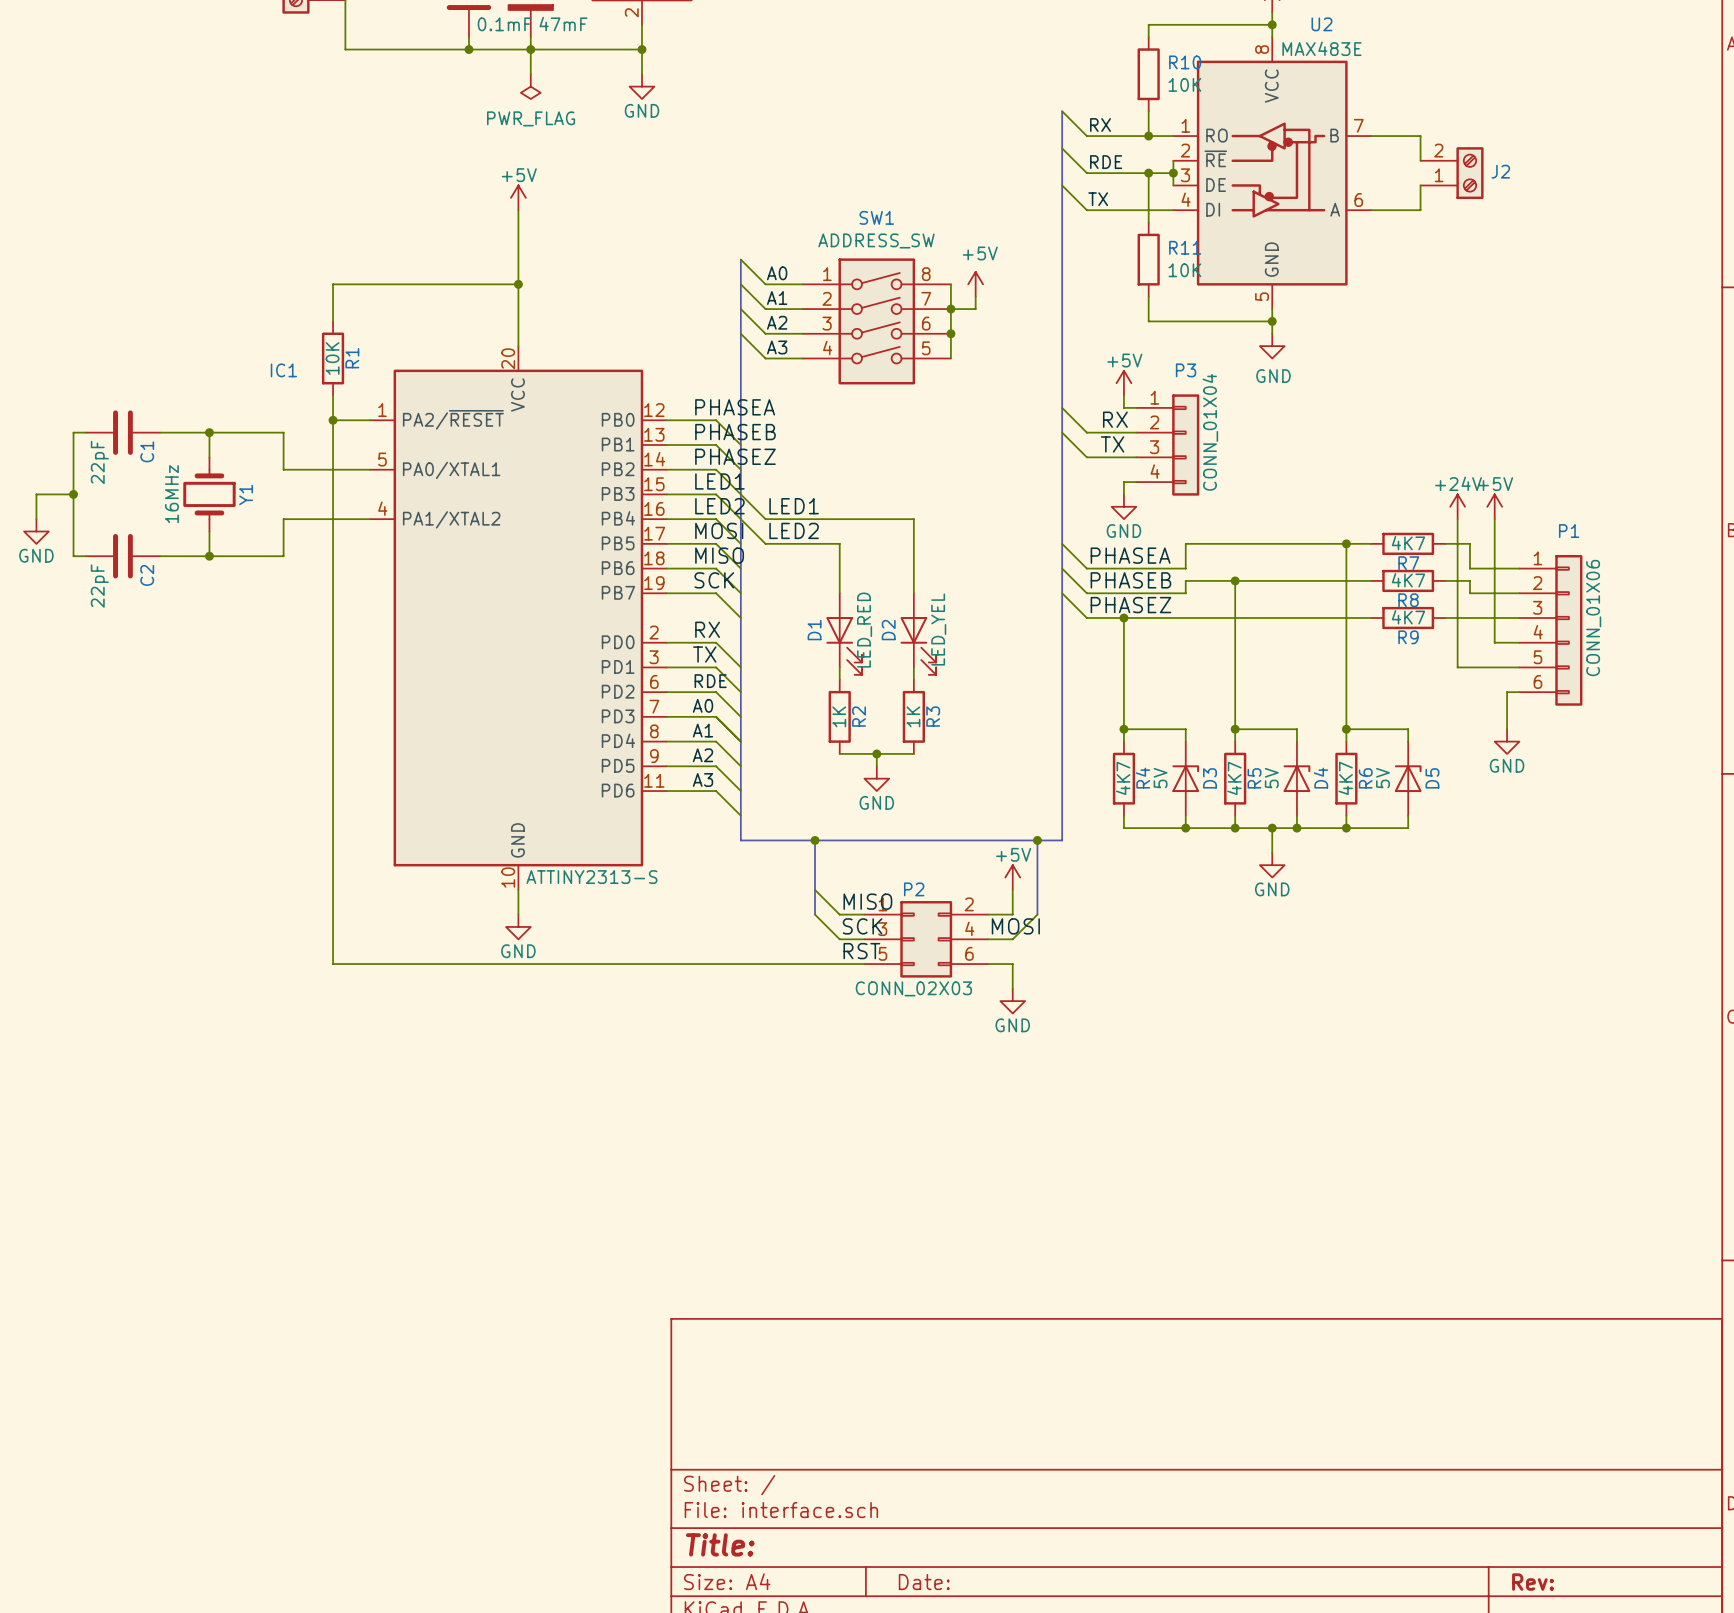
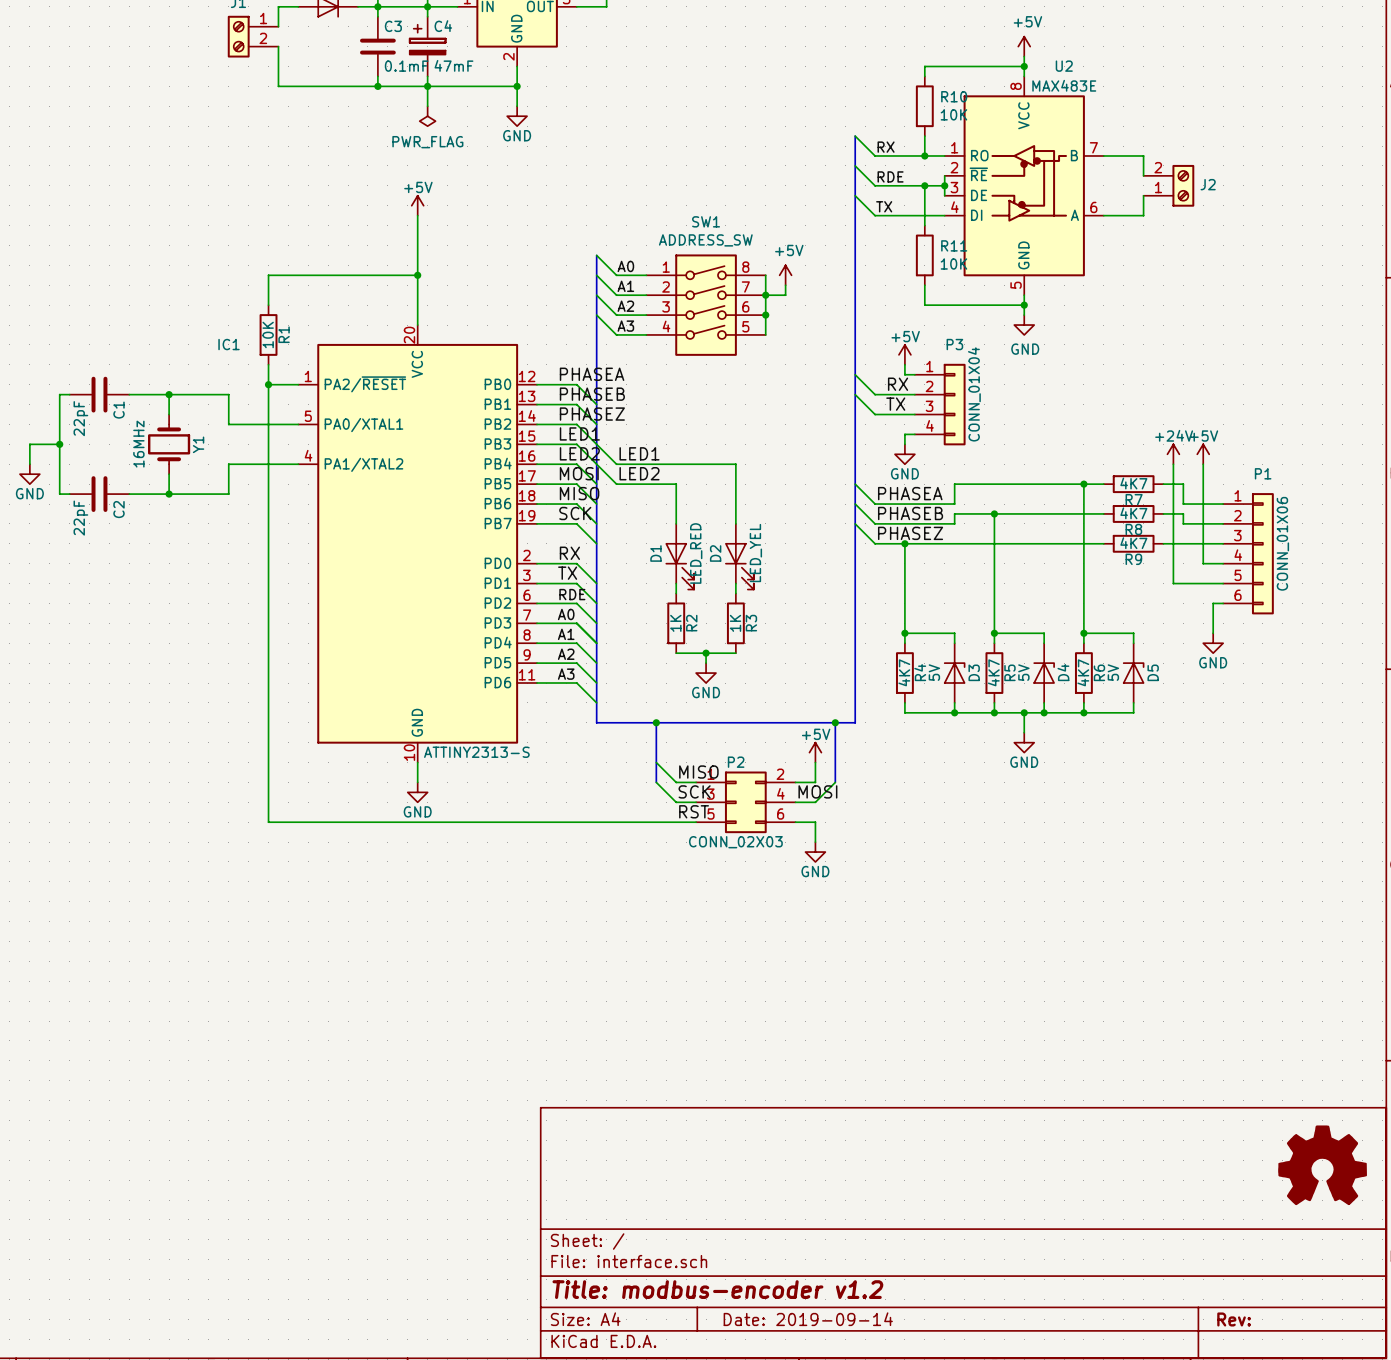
power symbol: none -> (1322, 1165)
title block: Title: (720, 1544) -> Title: modbus-encoder v1.2 (717, 1289)
title block: Date: (924, 1582) -> Date: 2019-09-14 (808, 1319)

